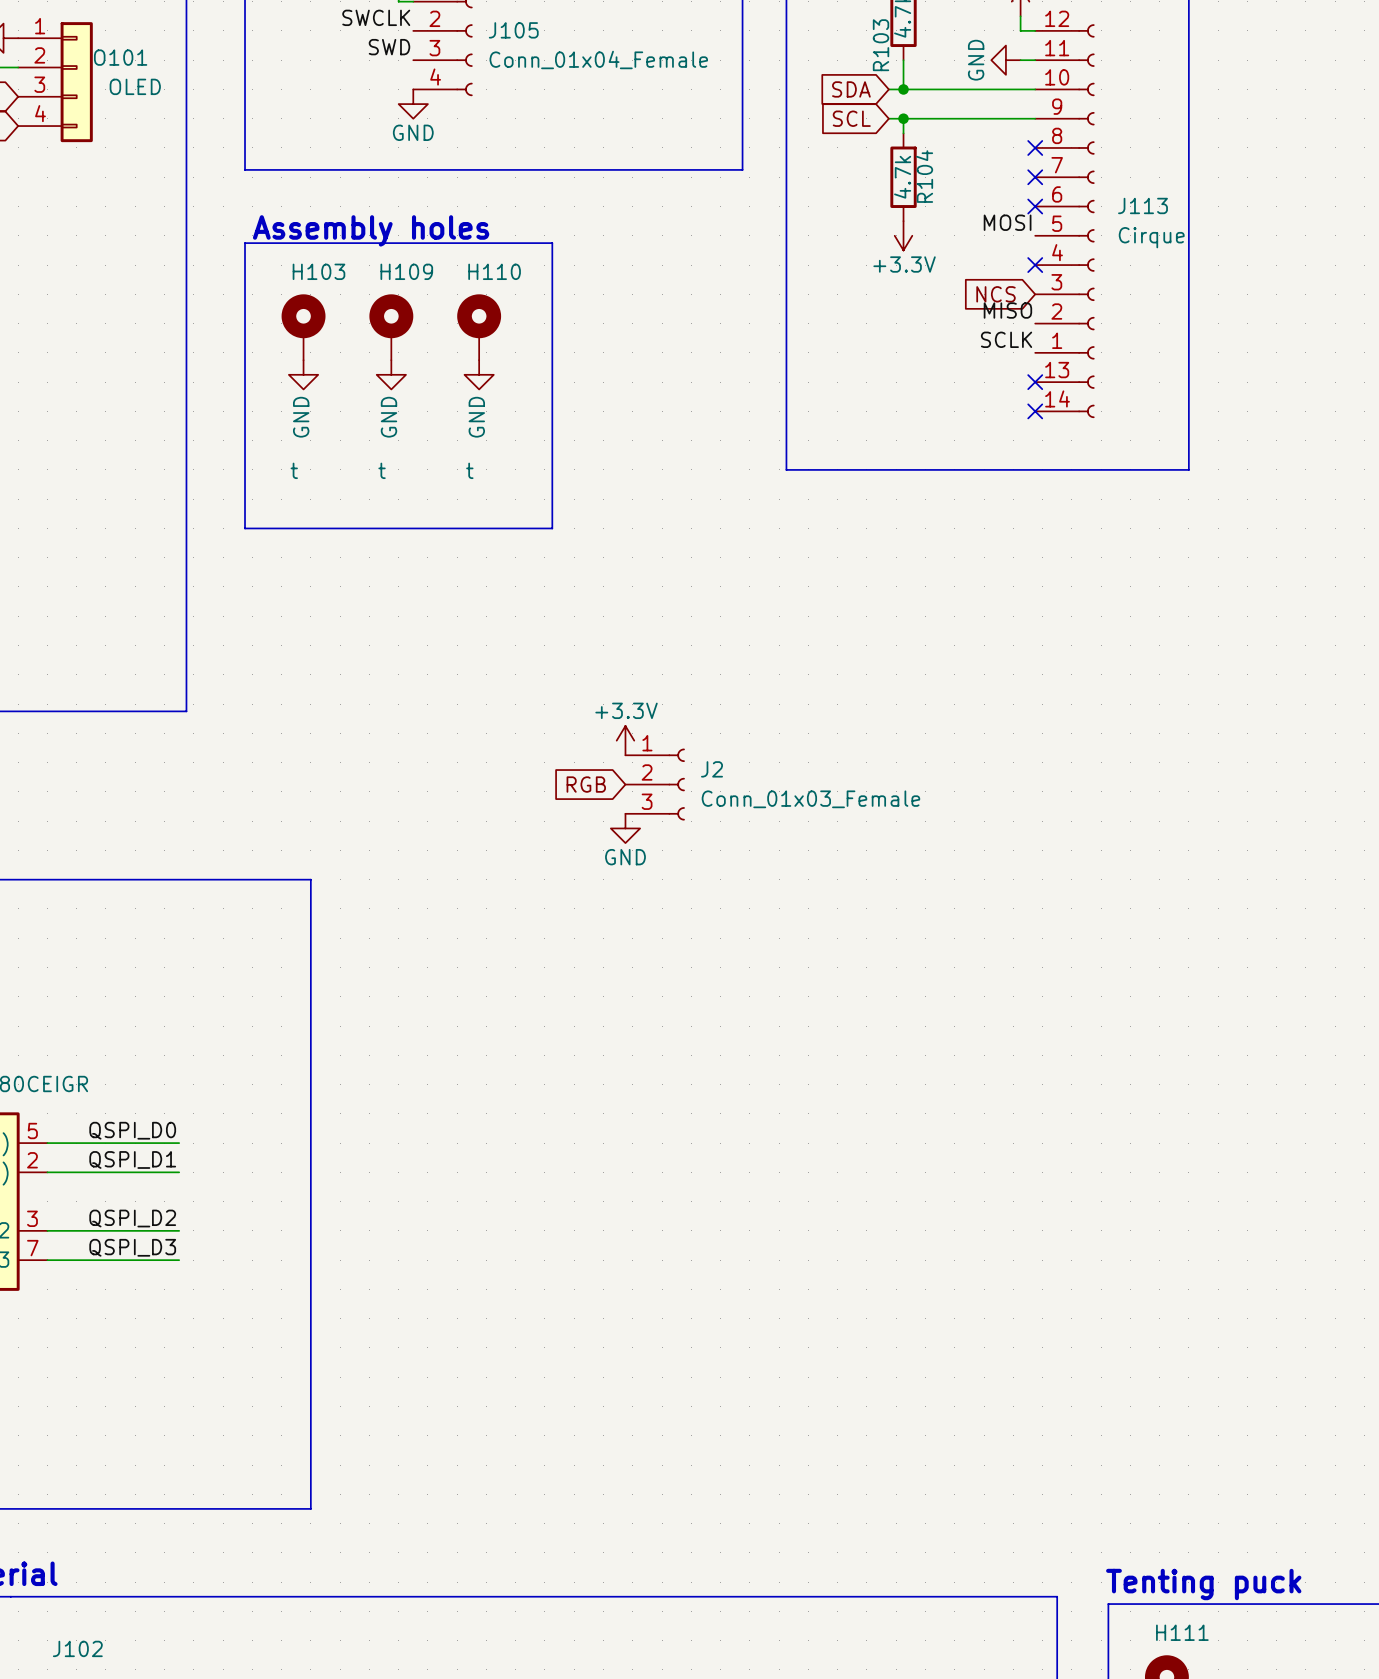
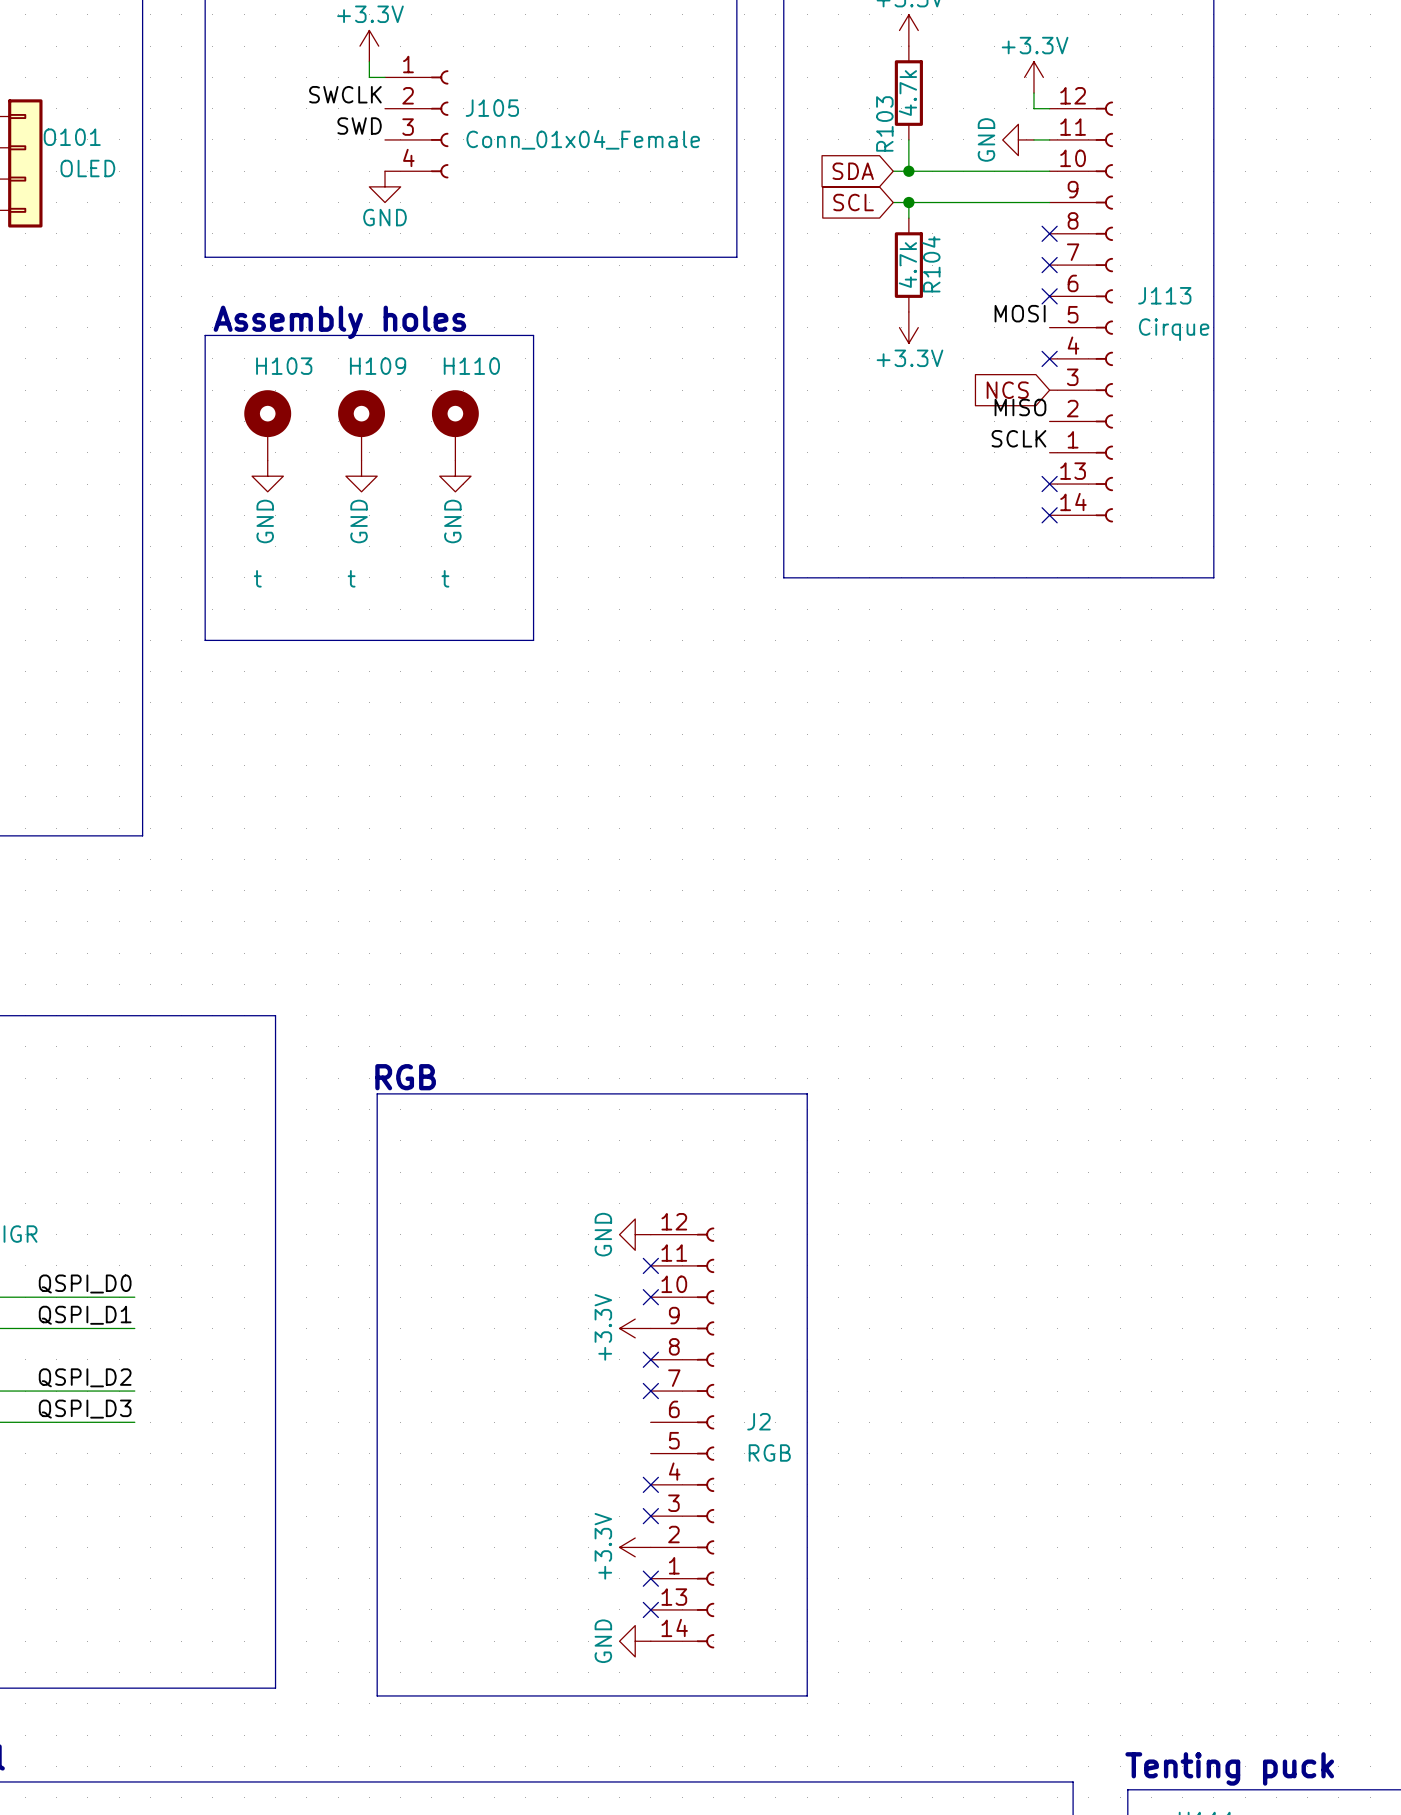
power symbol: +3.3V (625, 740) -> none
J2 symbol: [625, 748, 685, 821] -> [650, 1227, 715, 1649]
global label: RGB (586, 784) -> none
J2 value: Conn_01x03_Female (810, 799) -> RGB (769, 1452)
power symbol rotation: 0° (625, 828) -> 90° clockwise (635, 1234)
power symbol position: GND (625, 828) -> GND (635, 1234)
text: none -> RGB (405, 1077)
line: none -> (377, 1093) (807, 1093) (807, 1695) (377, 1695) (377, 1093)
no-connect mark: none -> (650, 1265)
no-connect mark: none -> (650, 1297)
power symbol: none -> +3.3V (635, 1328)
no-connect mark: none -> (650, 1359)
no-connect mark: none -> (650, 1391)
no-connect mark: none -> (650, 1484)
no-connect mark: none -> (650, 1516)
power symbol: none -> +3.3V (635, 1547)
no-connect mark: none -> (650, 1578)
no-connect mark: none -> (650, 1609)
power symbol: none -> GND (635, 1641)

